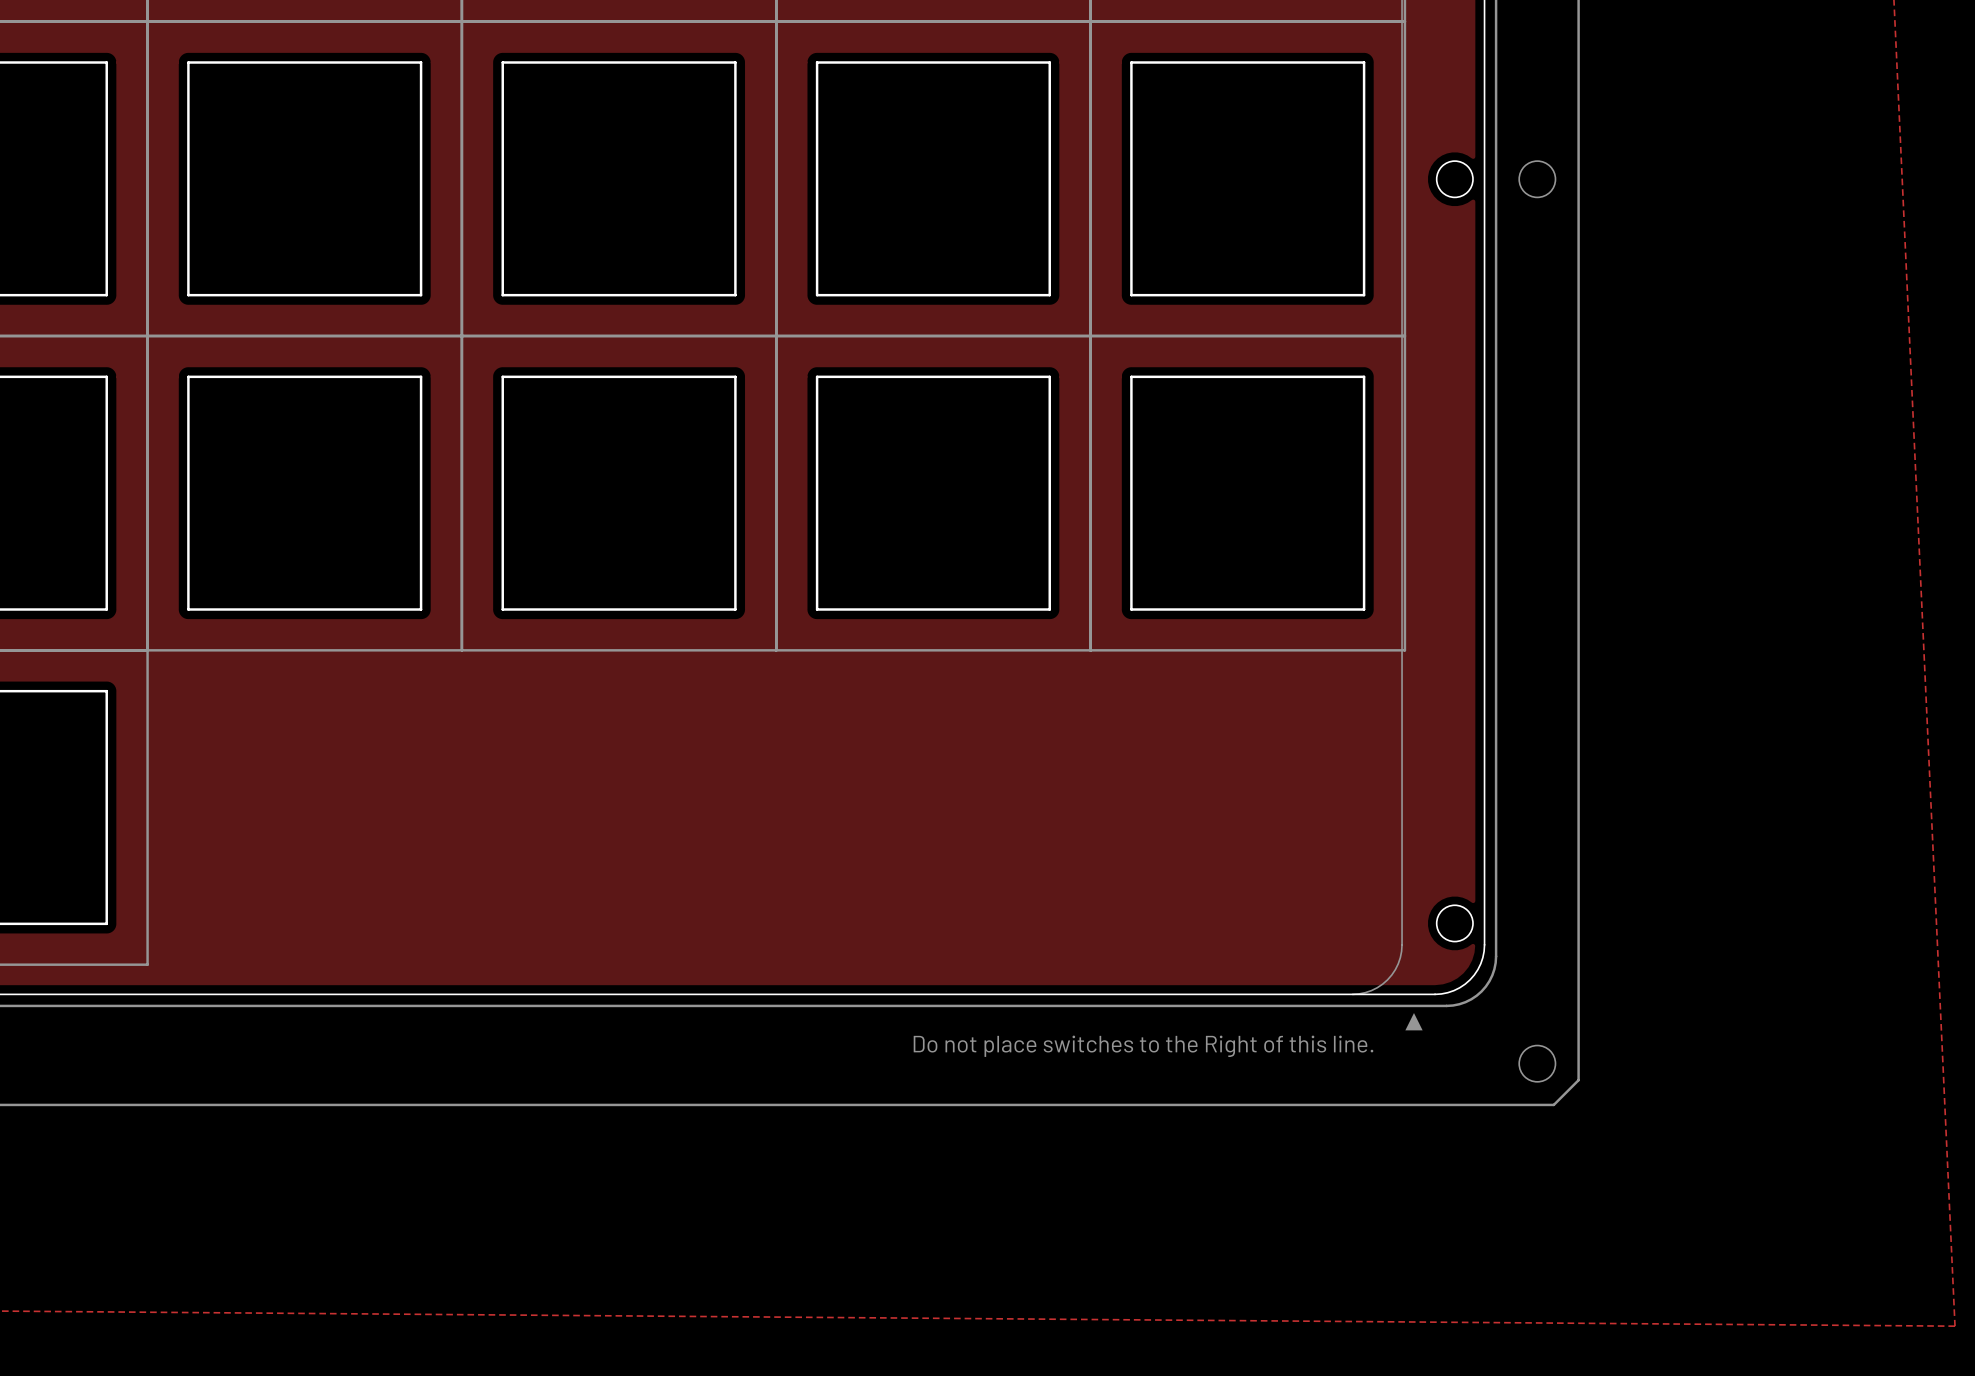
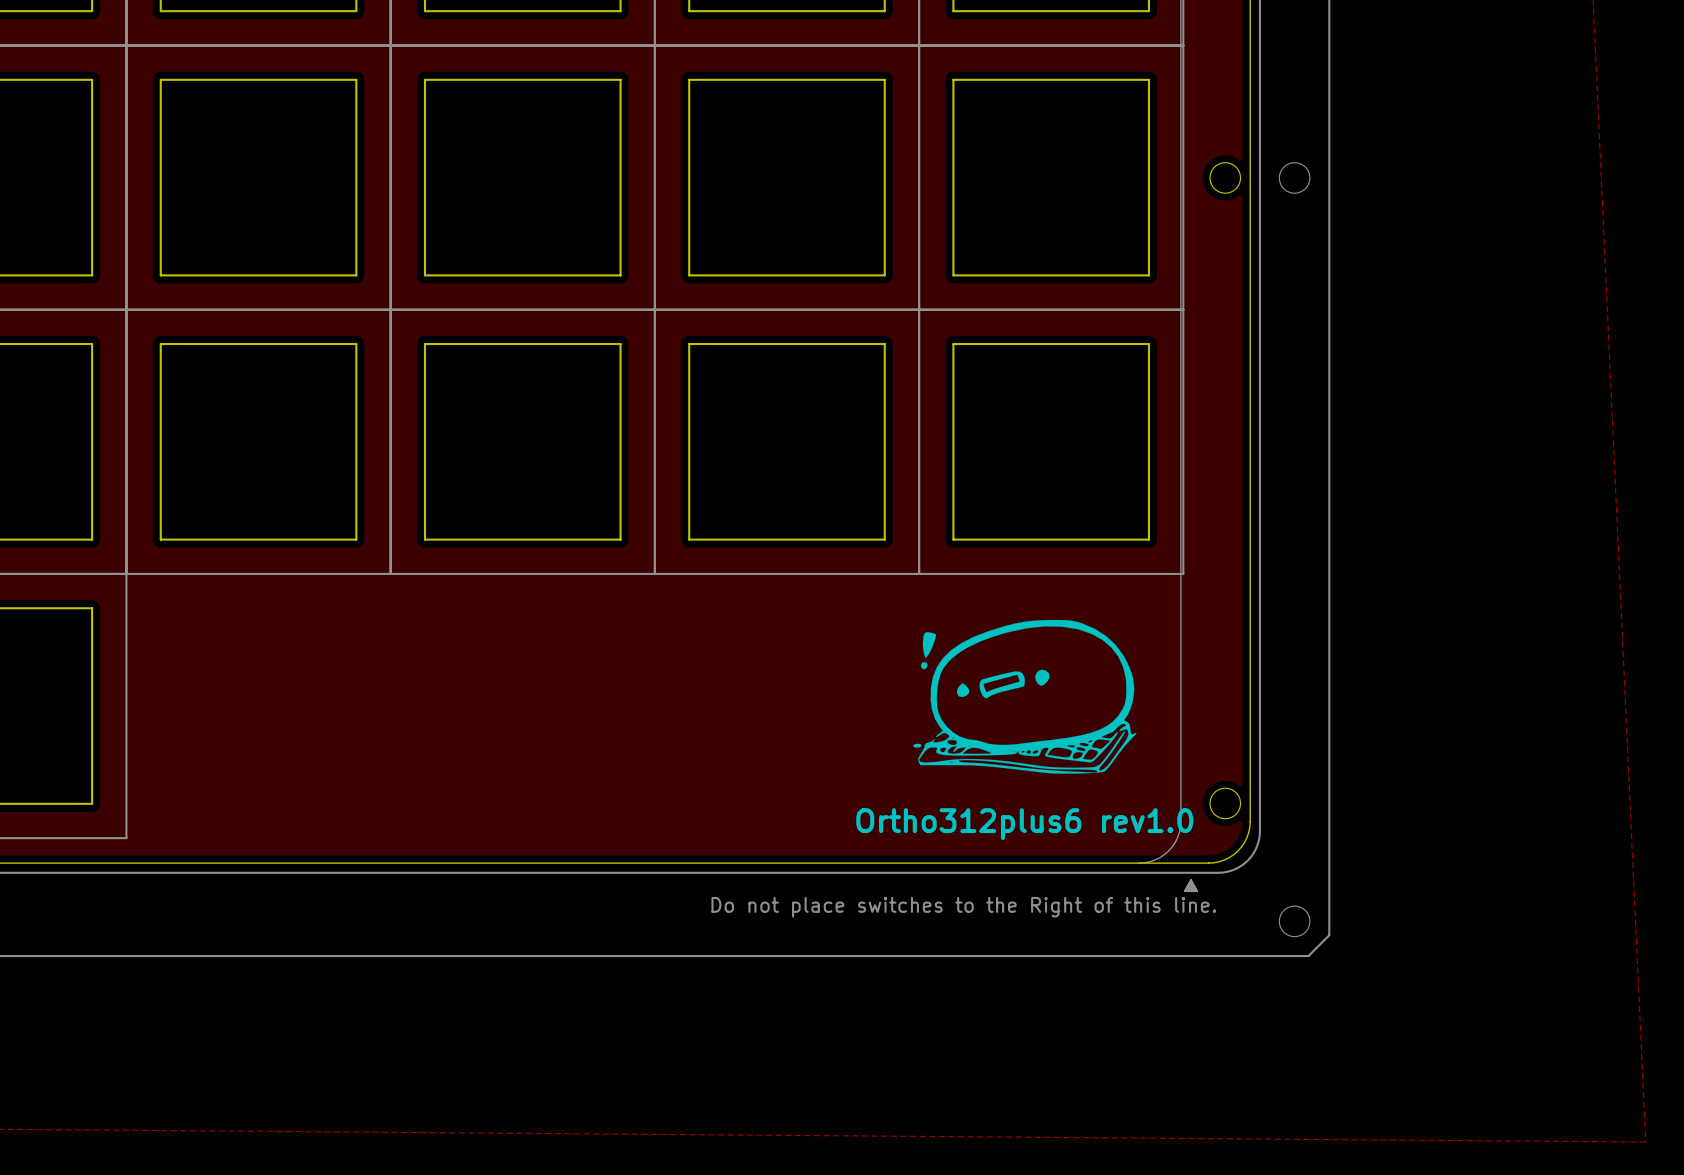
drawing: none -> [913, 619, 1137, 774]
text: none -> Ortho312plus6 rev1.0 (1024, 824)

